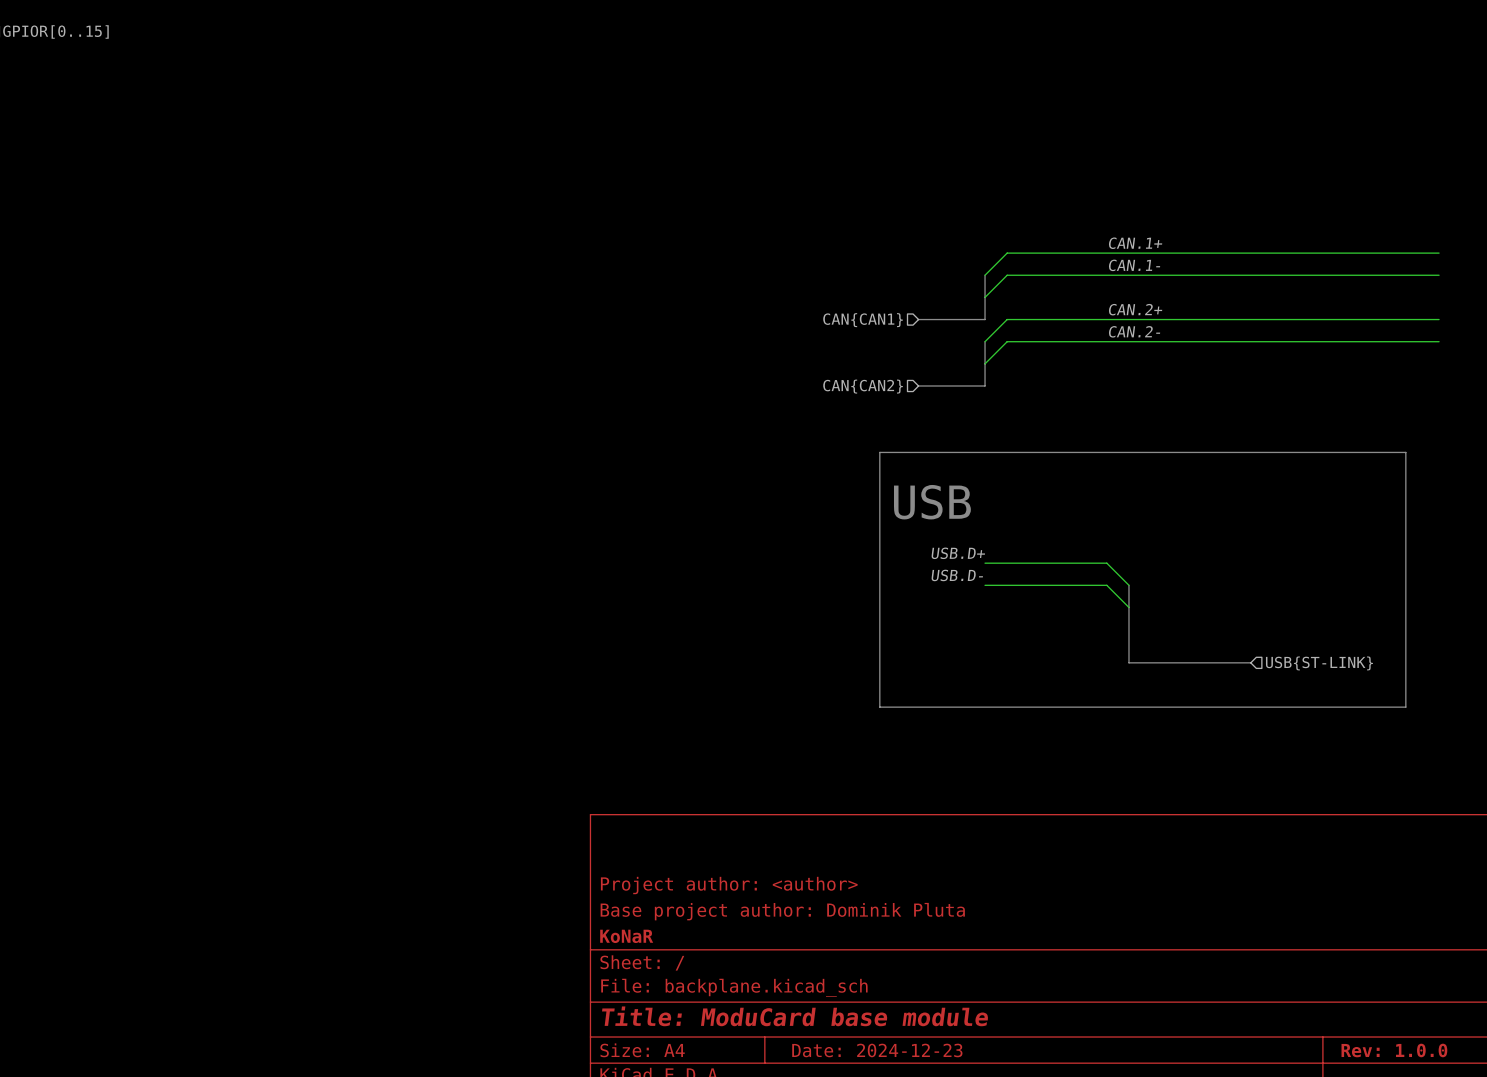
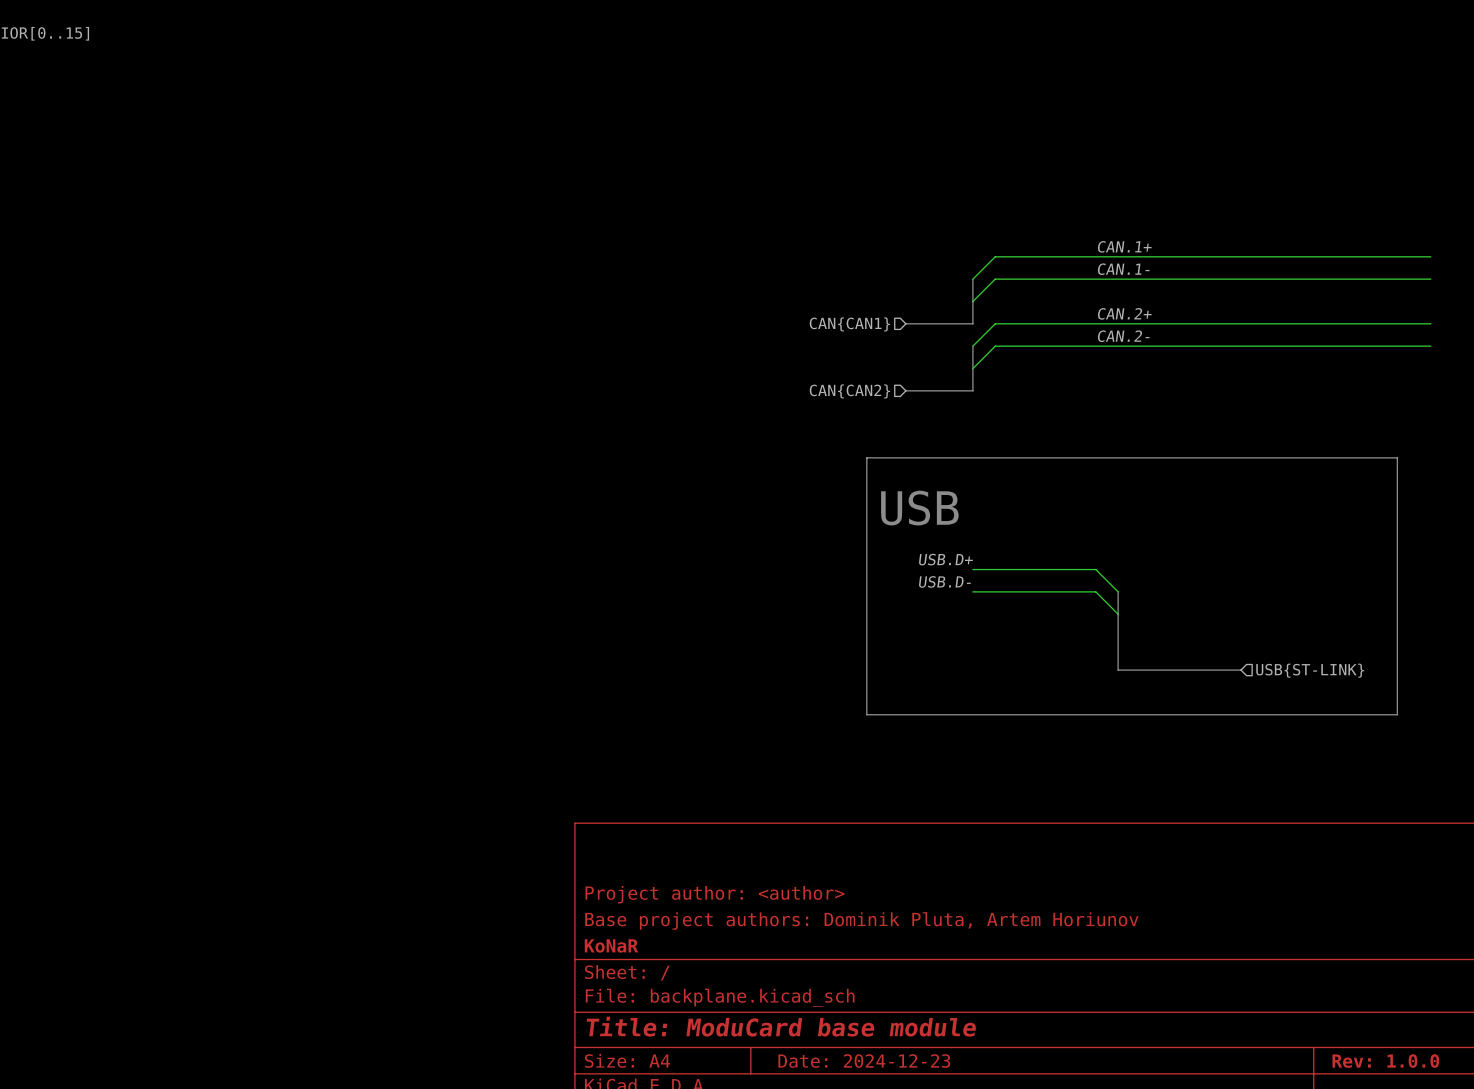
title block: Base project author: Dominik Pluta (782, 911) -> Base project authors: Dominik Pluta, Artem Horiunov (861, 921)

